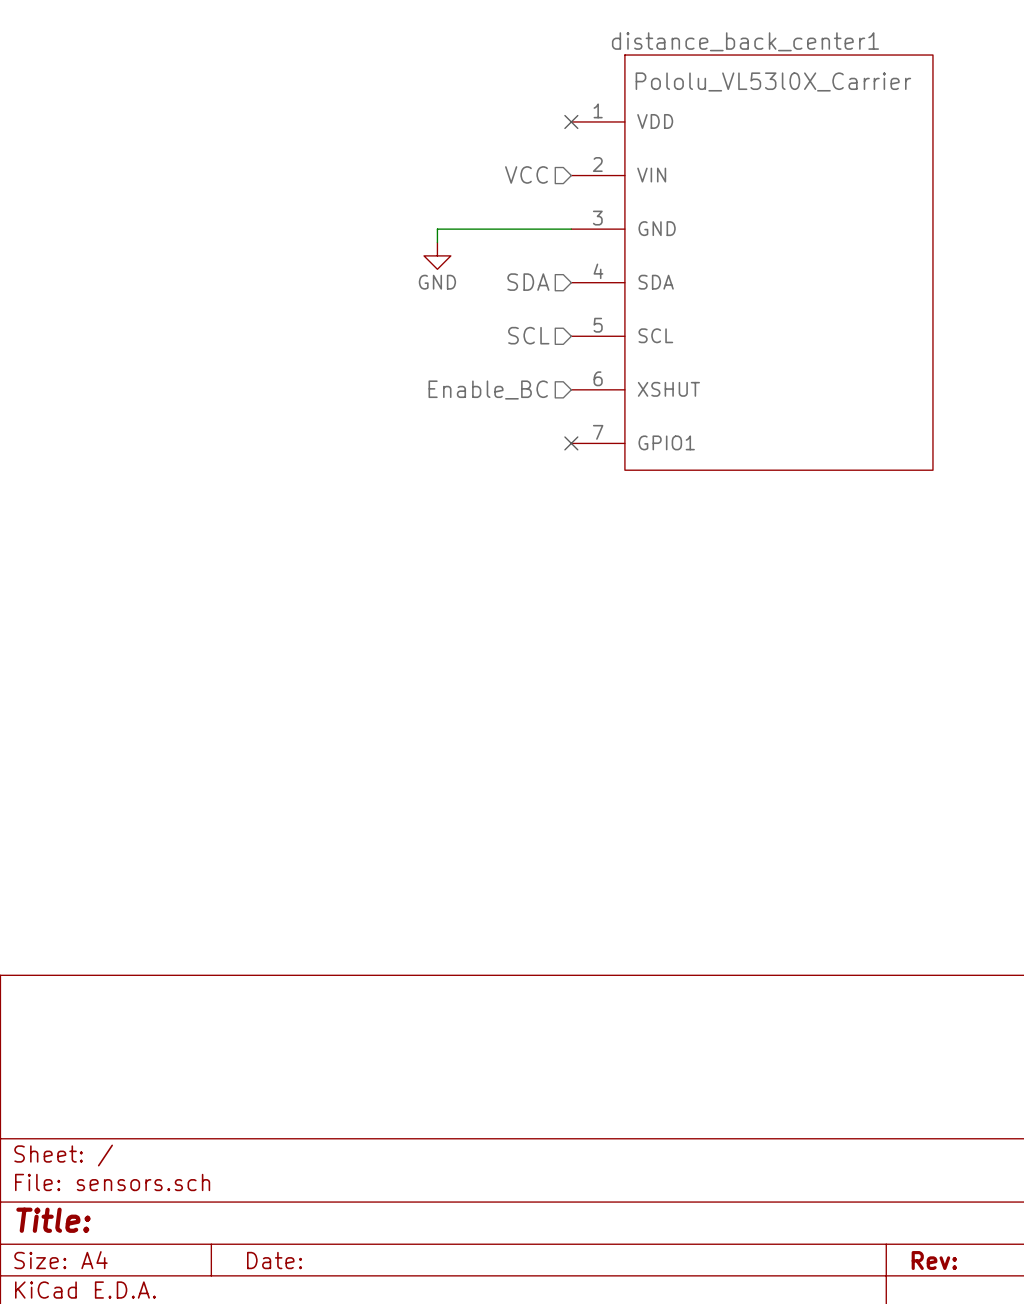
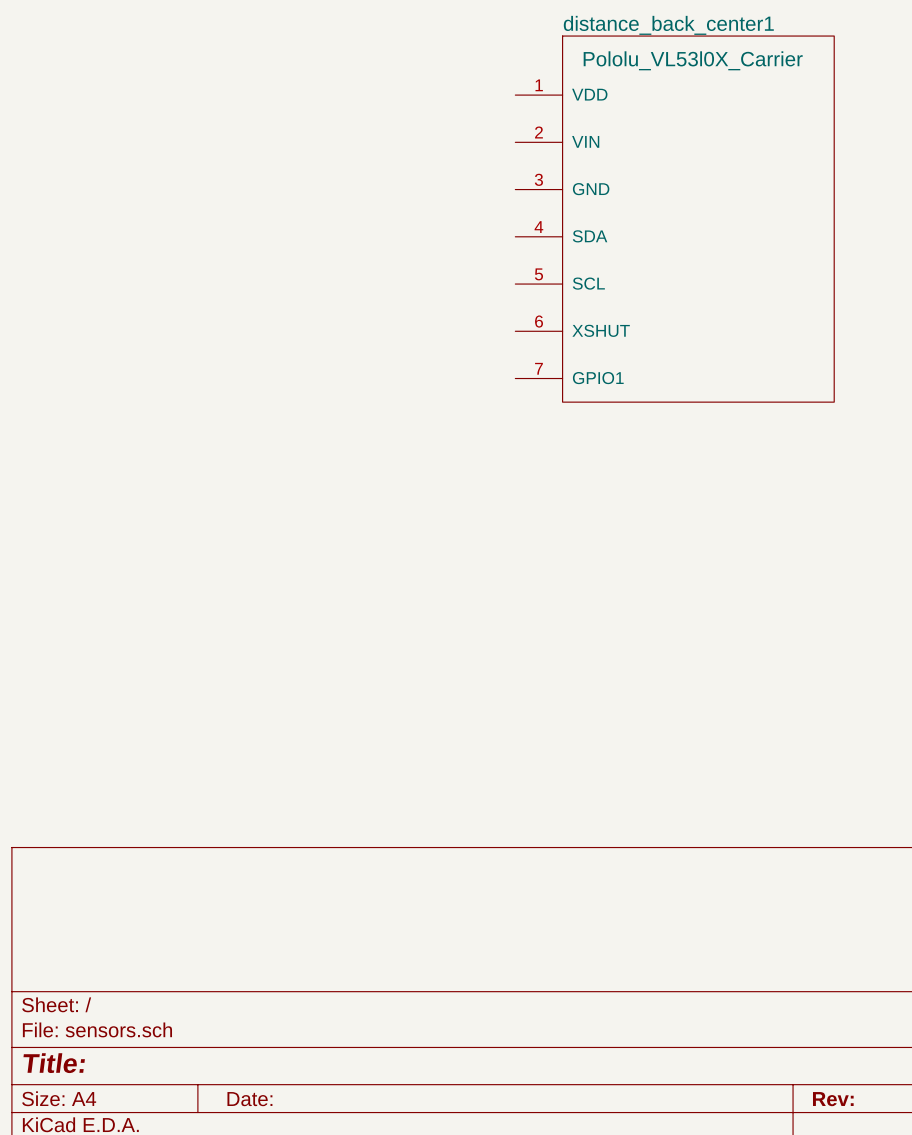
no-connect mark: (571, 121) -> none
hierarchical label: VCC (526, 174) -> none
wire: (571, 229) (437, 229) (437, 242) -> none
power symbol: GND (437, 255) -> none
hierarchical label: SDA (528, 282) -> none
hierarchical label: SCL (528, 335) -> none
hierarchical label: Enable_BC (488, 390) -> none
no-connect mark: (571, 443) -> none

